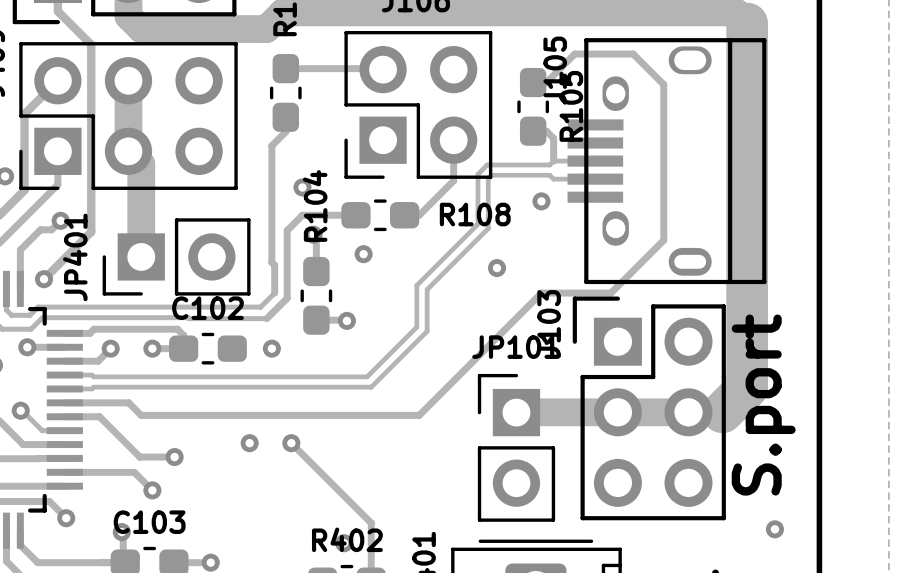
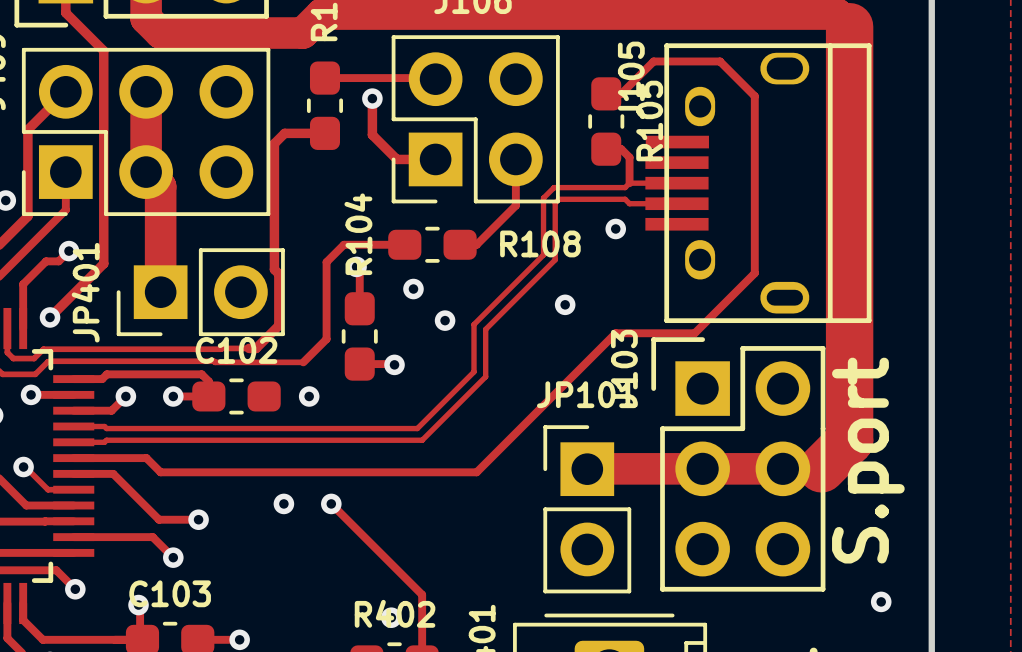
track: none -> (372, 98) (372, 134) (396, 159) (435, 159)
via: none -> (372, 98)
track: (285, 117) (285, 131) (271, 145) (271, 262) (274, 265) (274, 293) (260, 307) (194, 307) -> (324, 133) (284, 133) (274, 143) (274, 269) (278, 273) (278, 325) (256, 348) (220, 349)
via: (302, 187) -> none
via: none -> (445, 320)

